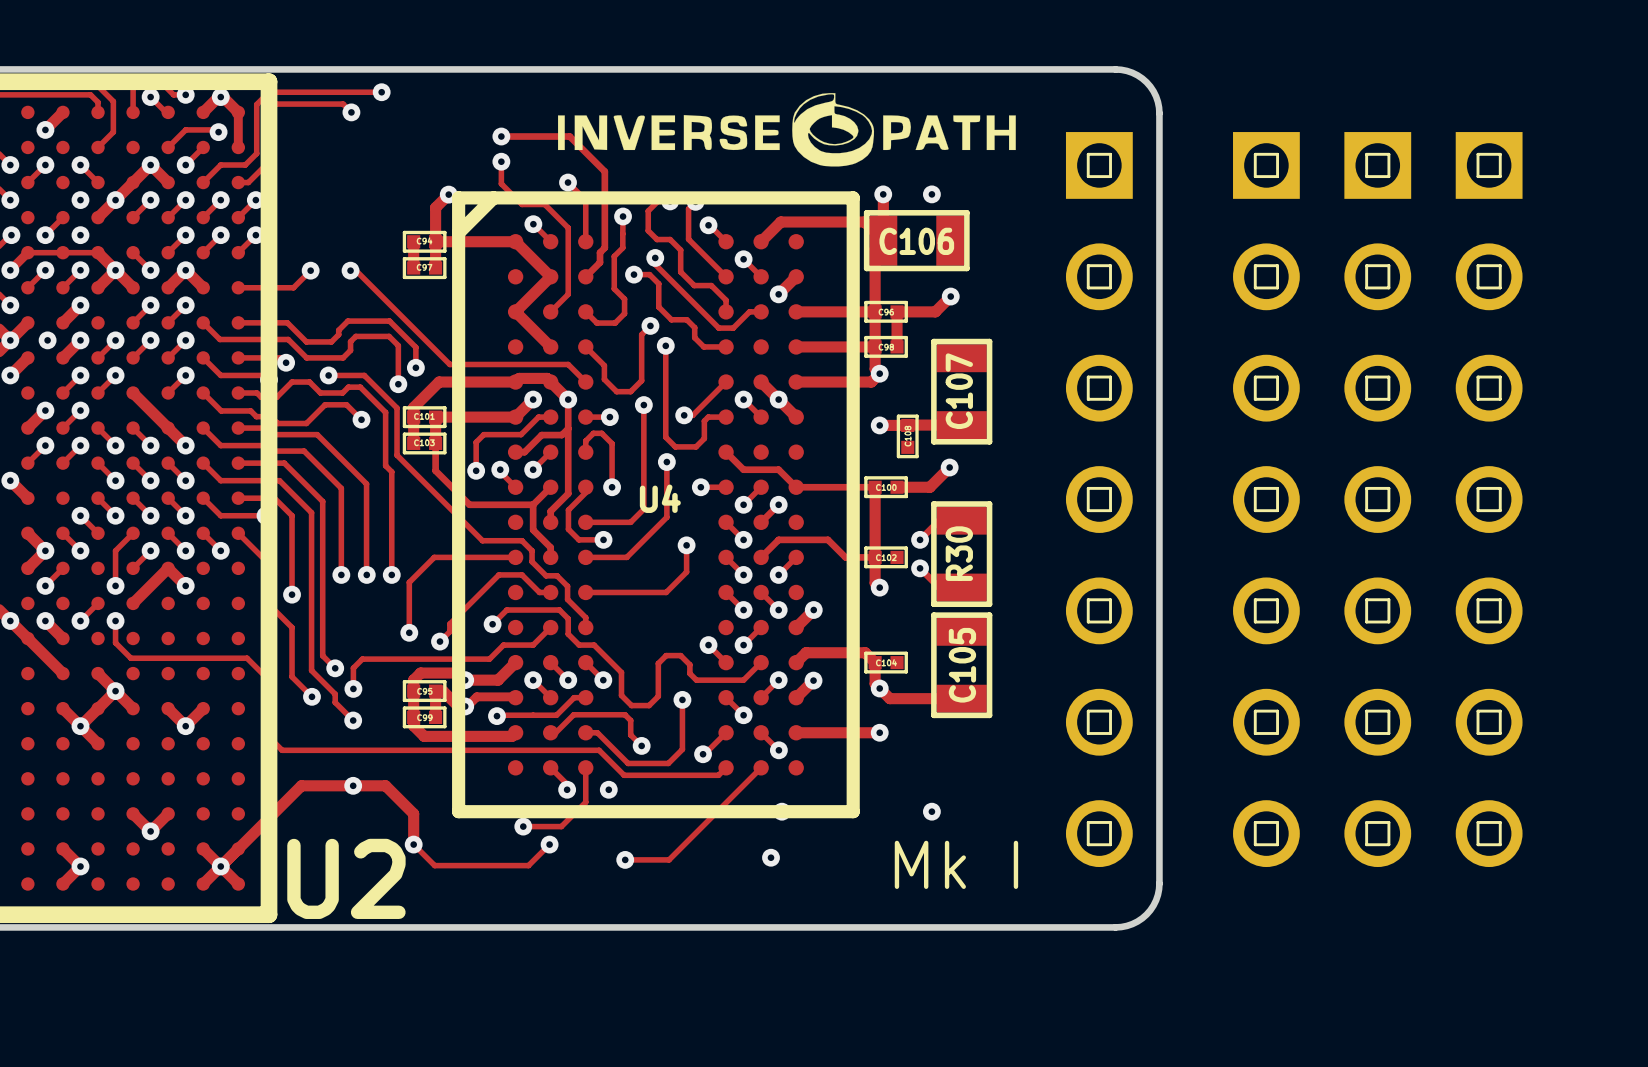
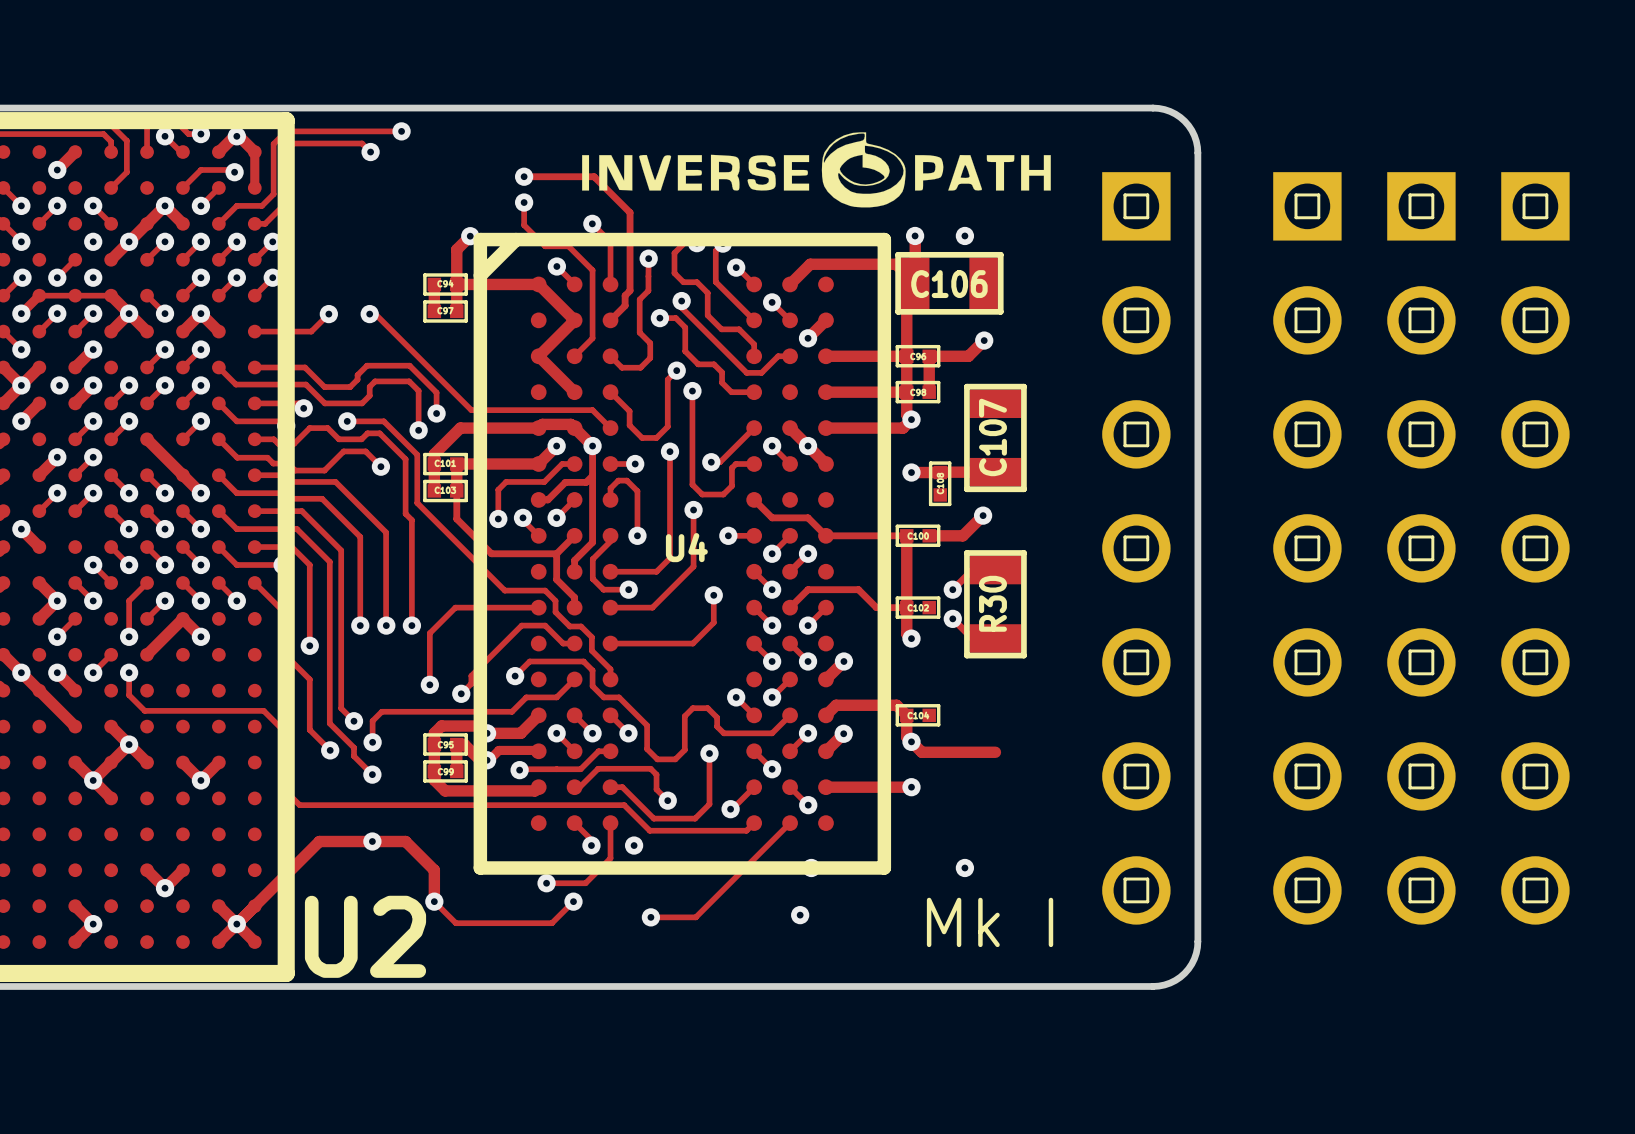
C105: (961, 665) -> none

